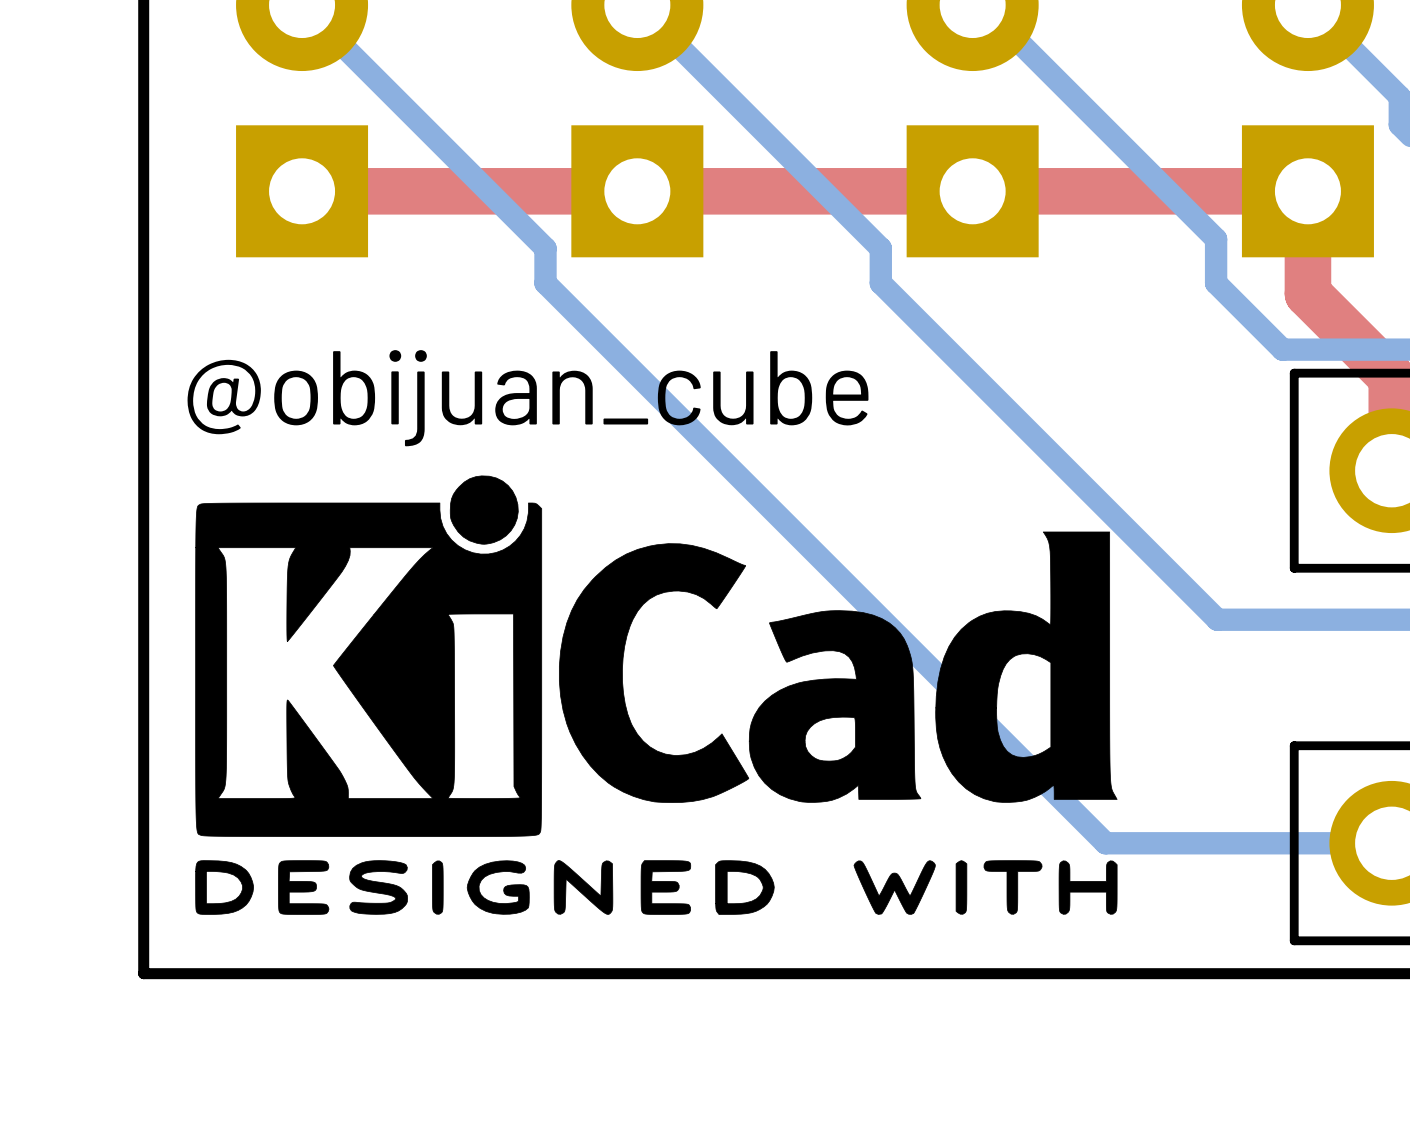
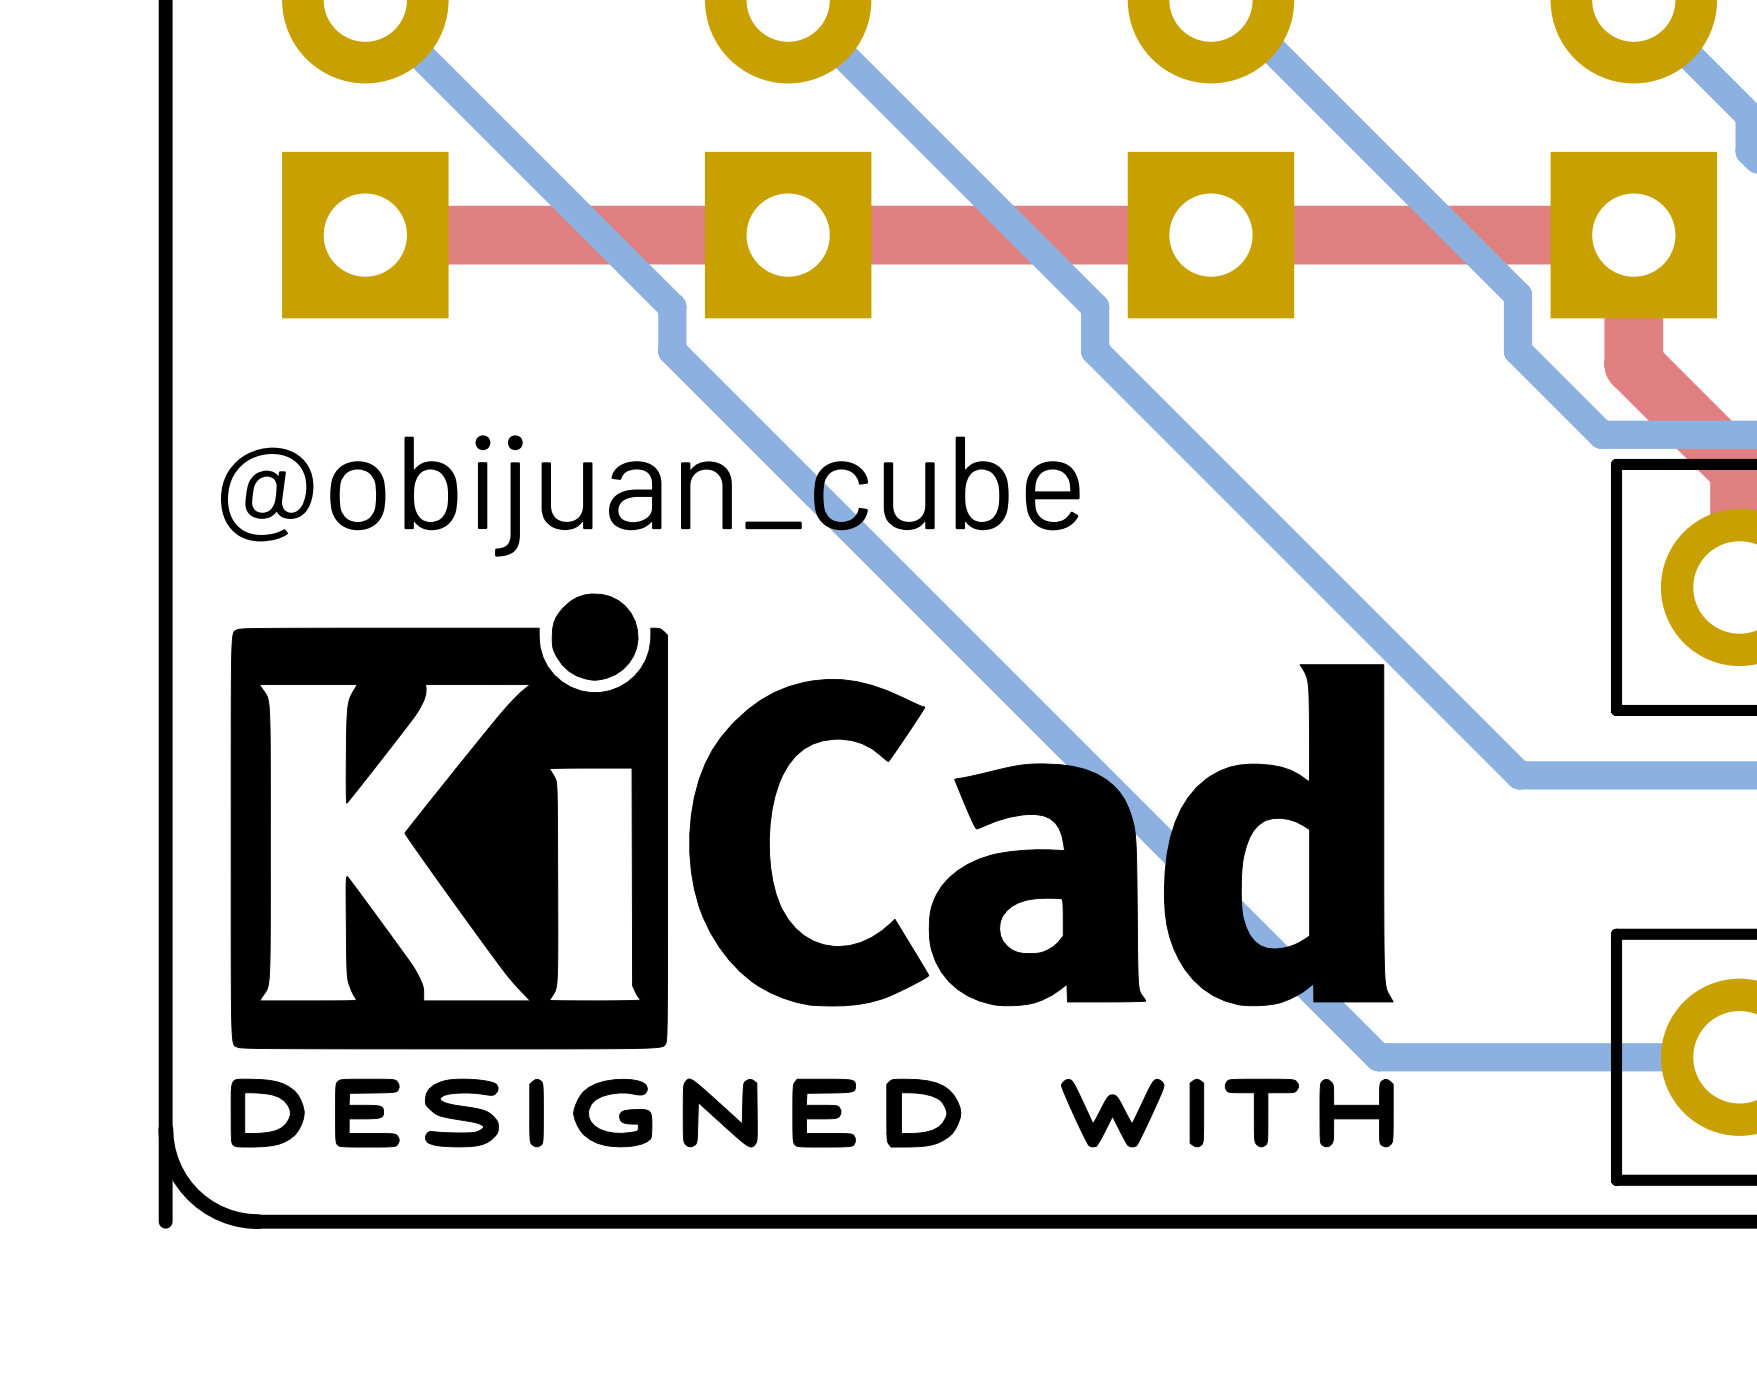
board edge: (217, 973) (143, 973) -> (258, 1221) (227, 1216) (209, 1207) (192, 1194) (175, 1169) (168, 1149) (165, 1129)

